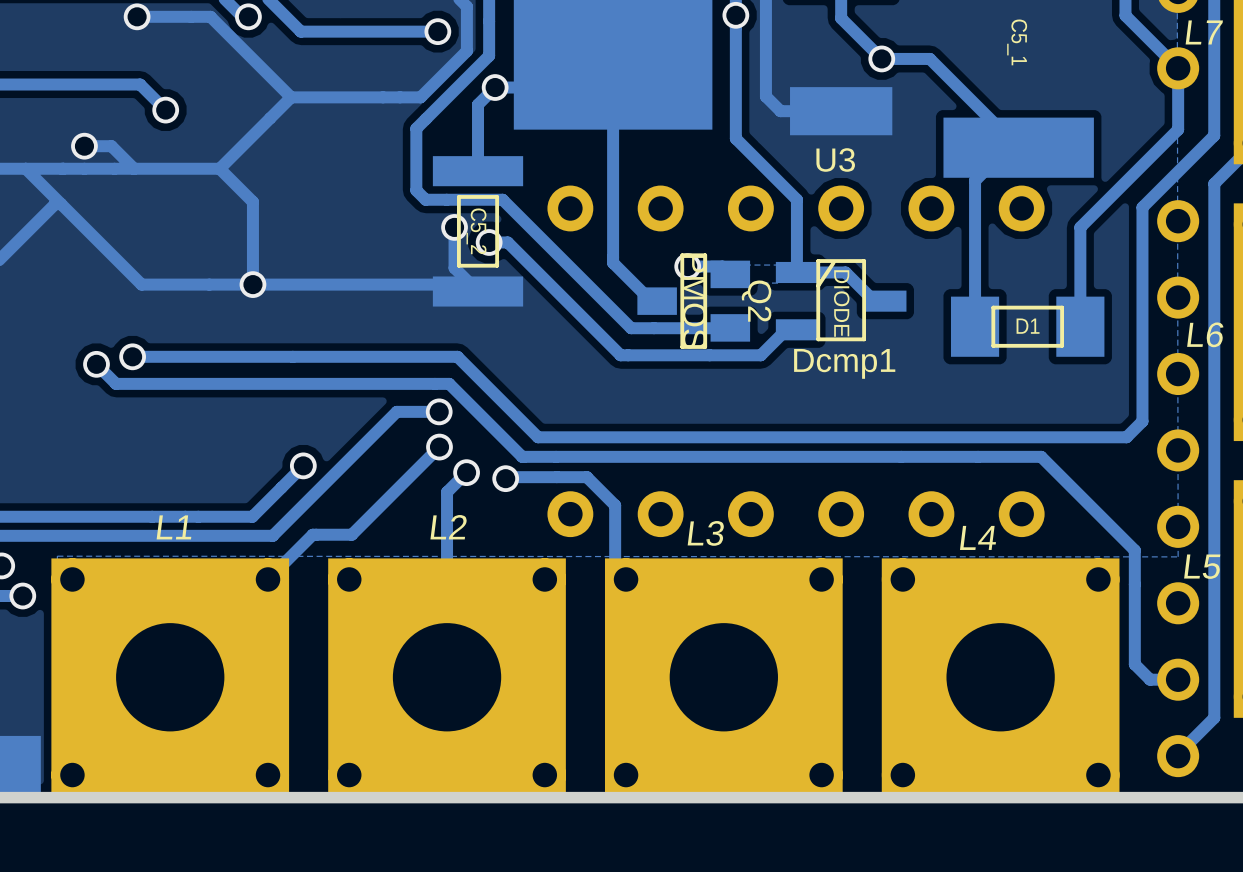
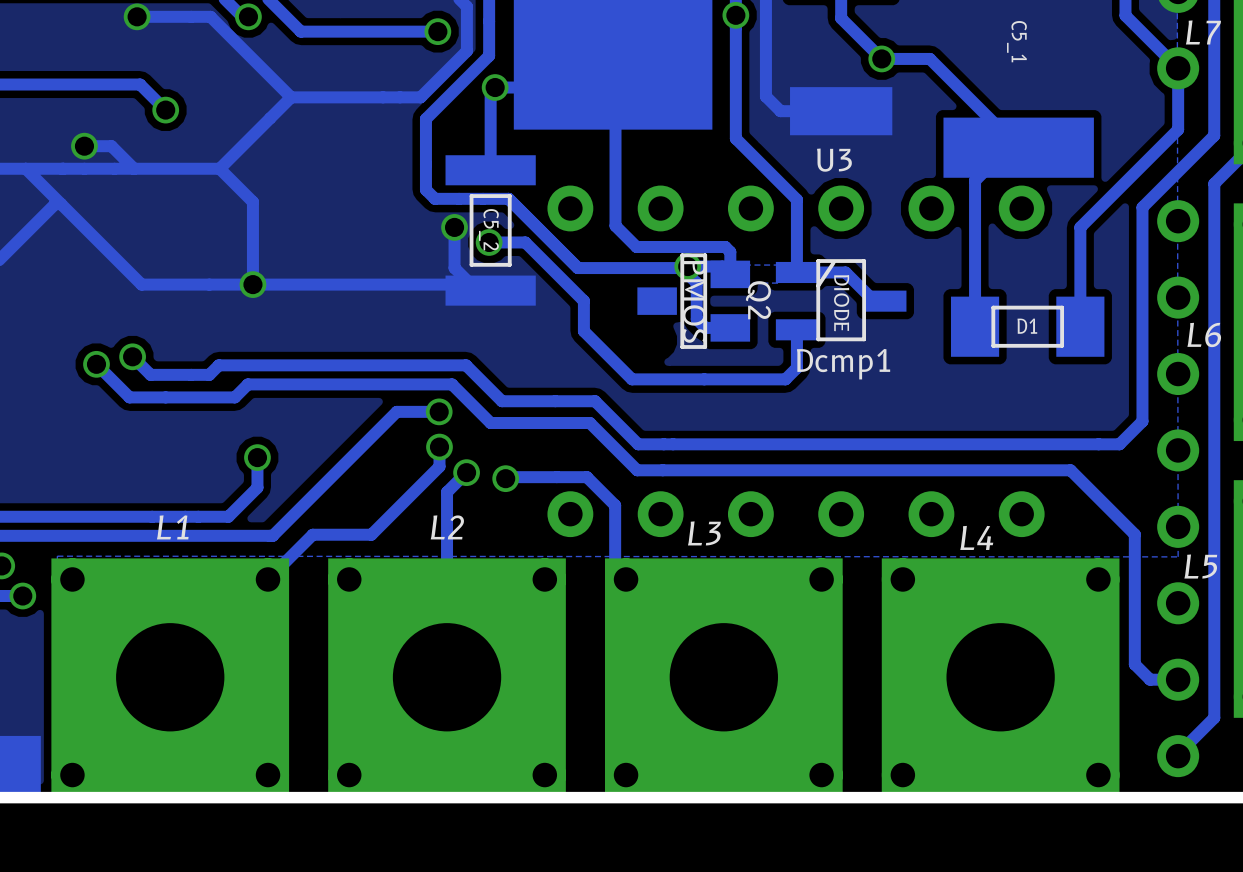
track: (613, 42) (613, 262) (651, 301) (657, 301) -> (613, 42) (615, 44) (615, 225) (636, 246) (725, 246) (730, 251) (730, 274)
track: (490, 92) (478, 104) (478, 171) -> (490, 92) (490, 170)
track: (425, 119) (416, 128) (416, 190) (425, 199) (502, 199) (631, 328) (729, 328) -> (425, 119) (425, 189) (434, 198) (508, 198) (577, 268) (681, 268) (696, 283) (696, 319) (705, 327) (730, 327)
C5_2 position: (478, 231) -> (490, 230)
track: (507, 242) (620, 355) (760, 355) (786, 329) (796, 329) -> (507, 242) (525, 242) (583, 301) (583, 331) (632, 379) (785, 379) (796, 367) (796, 329)
track: (132, 356) (457, 356) (466, 365) -> (132, 356) (150, 374) (209, 374) (218, 365) (466, 365)
track: (116, 383) (449, 383) (522, 456) (1041, 456) (1134, 550) -> (116, 383) (129, 397) (234, 397) (247, 384) (452, 384) (490, 423) (589, 423) (637, 470) (1070, 470) (1134, 534) (1134, 550)
track: (501, 401) (538, 437) (1126, 437) -> (501, 401) (595, 401) (638, 444) (1119, 444) (1126, 437)
track: (439, 447) (351, 534) -> (439, 447) (439, 466) (371, 534) (351, 534)
track: (303, 465) (252, 516) (228, 516) -> (257, 457) (257, 487) (228, 516)
via position: (303, 465) -> (257, 457)

